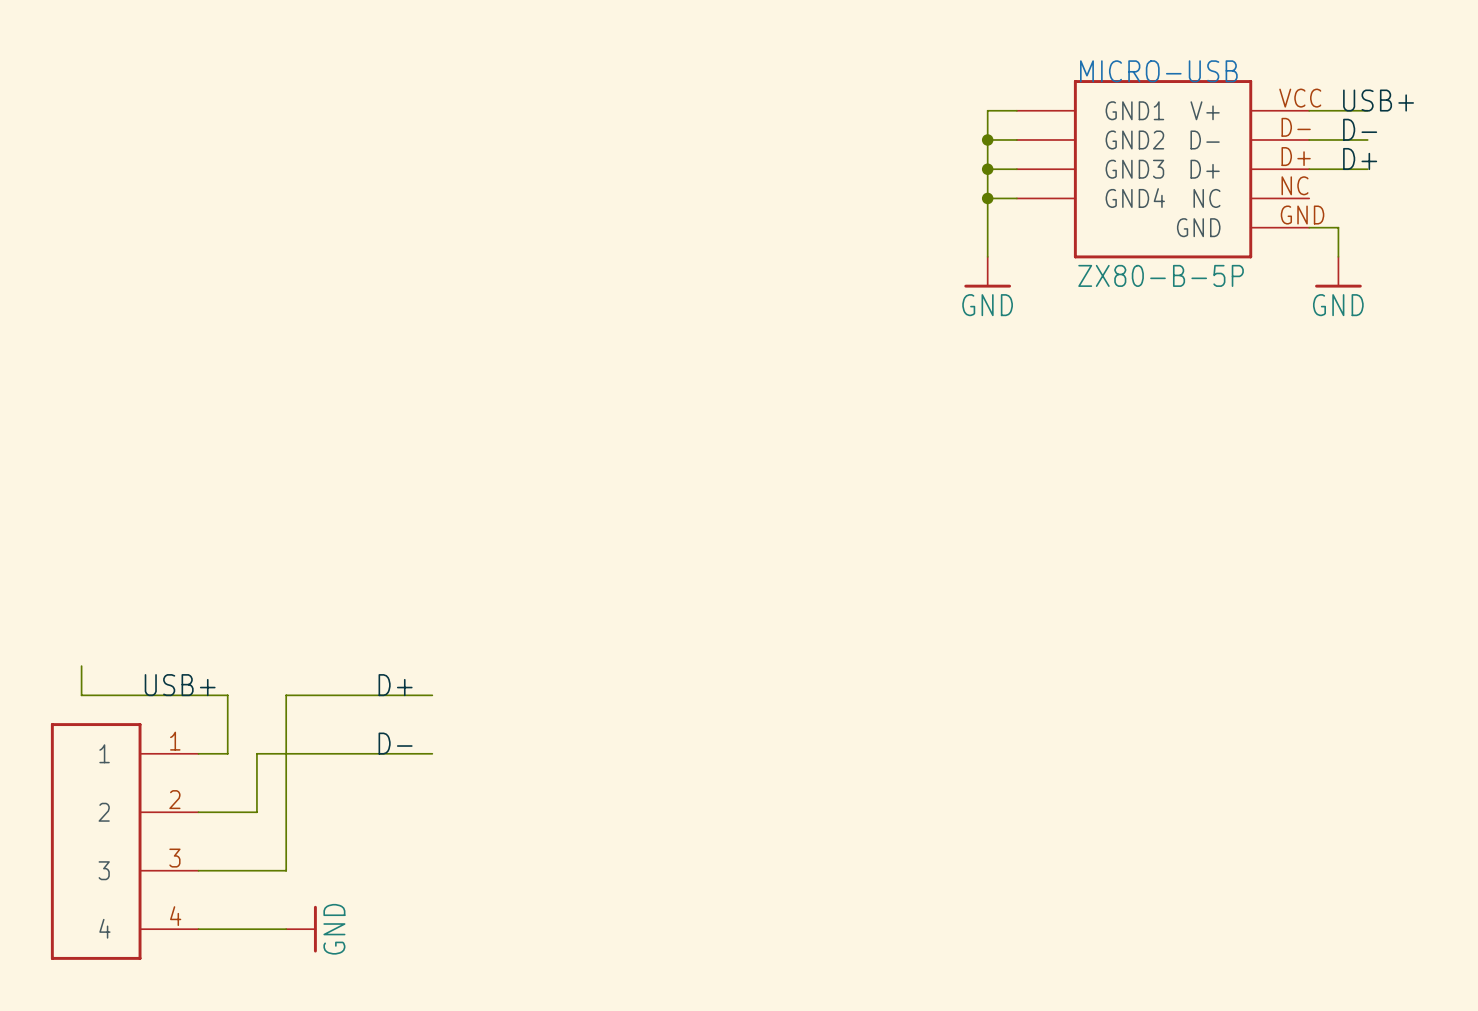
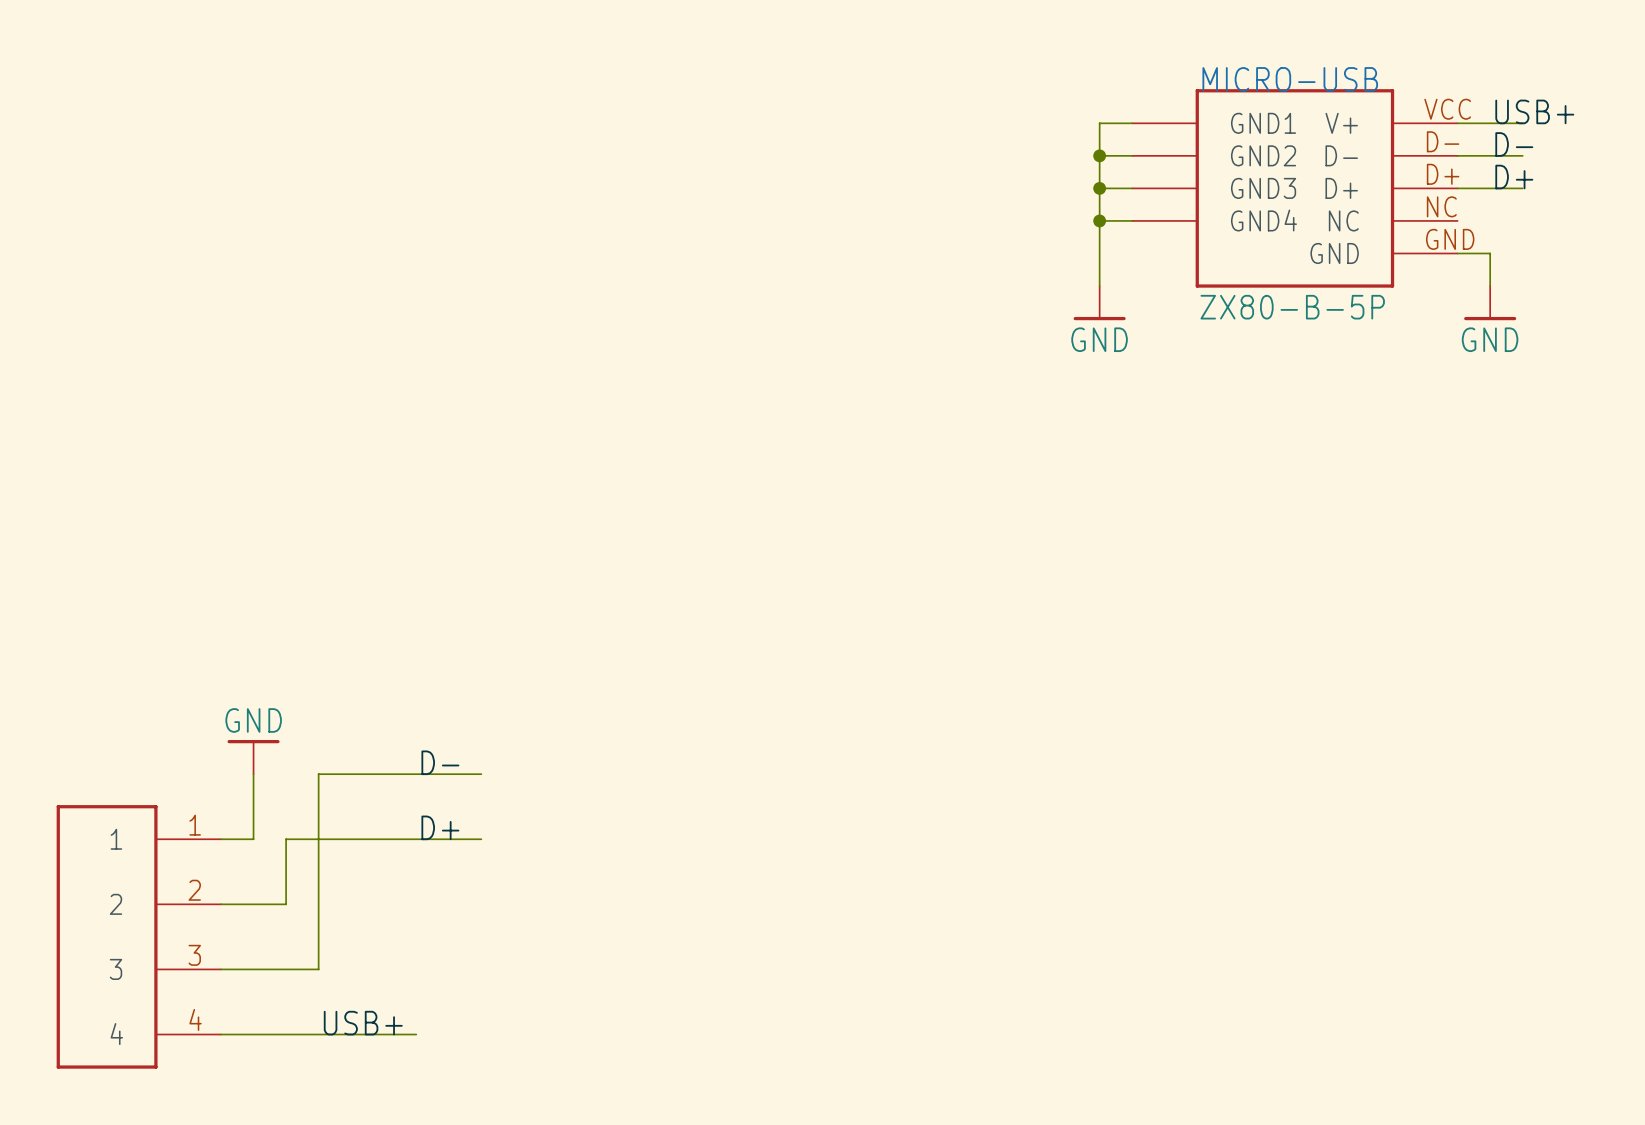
wire: (81, 666) (81, 695) (227, 695) -> none
label position: USB+ (180, 685) -> USB+ (363, 1023)
label: D+ (395, 685) -> D- (440, 762)
label: D- (395, 743) -> D+ (440, 827)
wire: none -> (318, 1034) (416, 1034)
power symbol position: GND (301, 929) -> GND (253, 757)
power symbol rotation: 0° (315, 929) -> 90° counterclockwise (253, 741)

